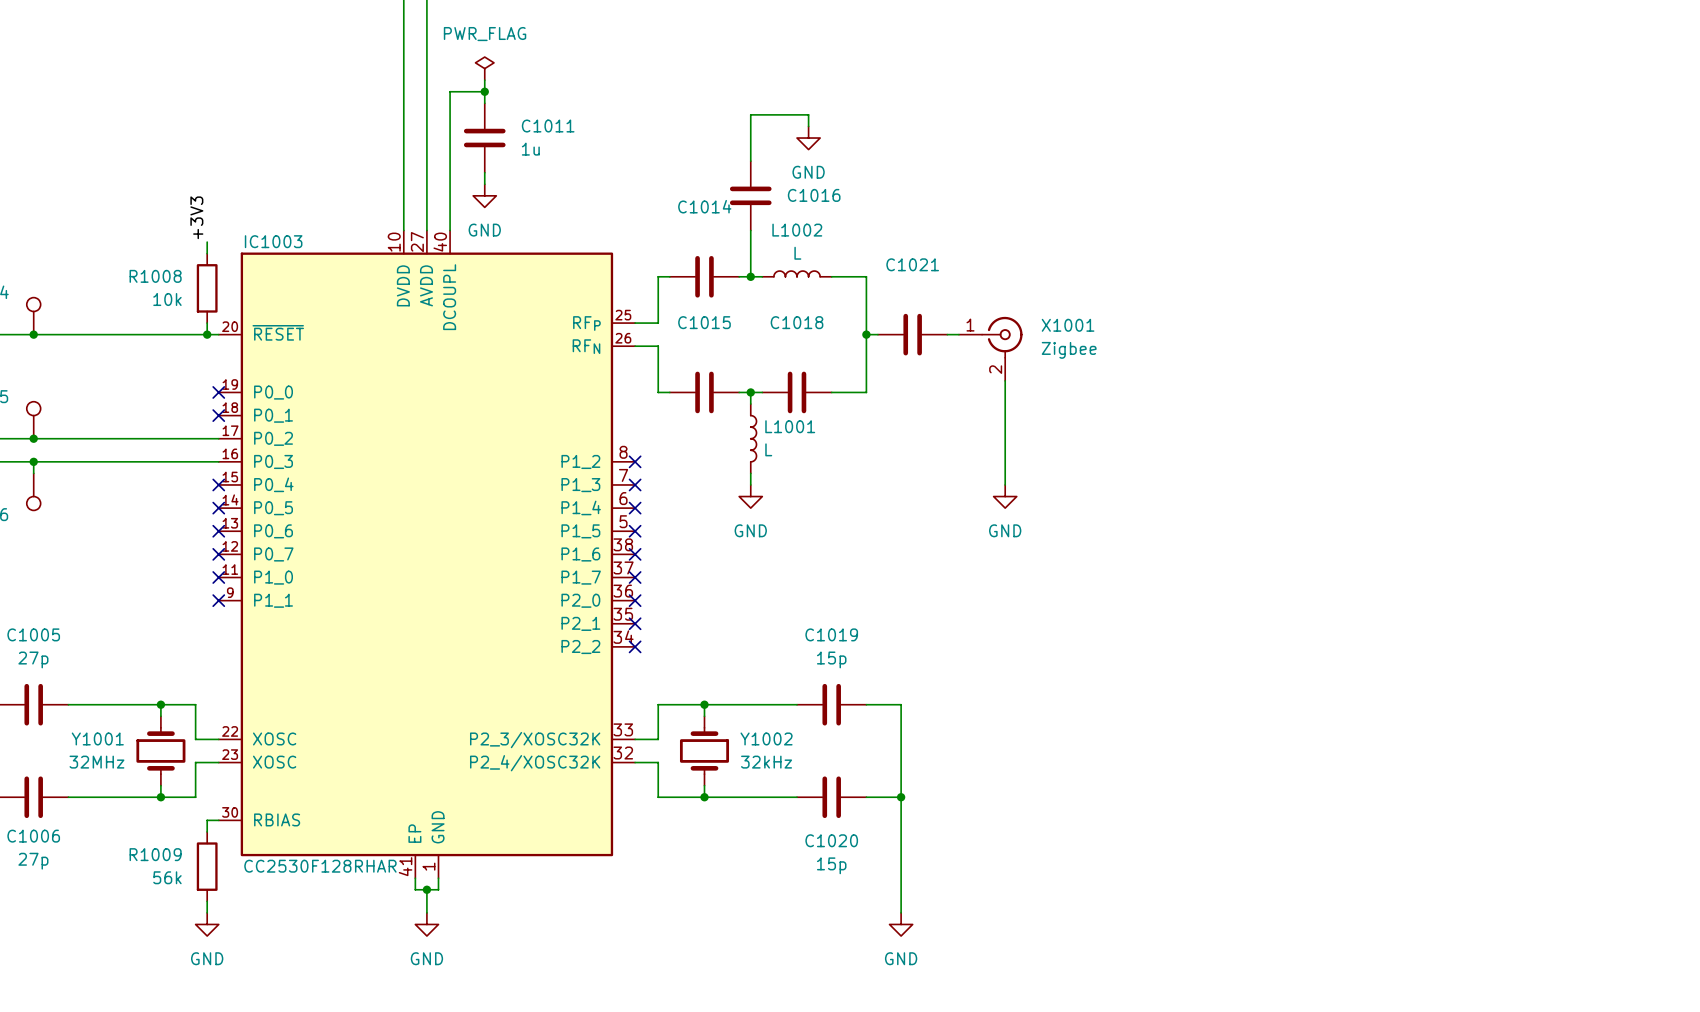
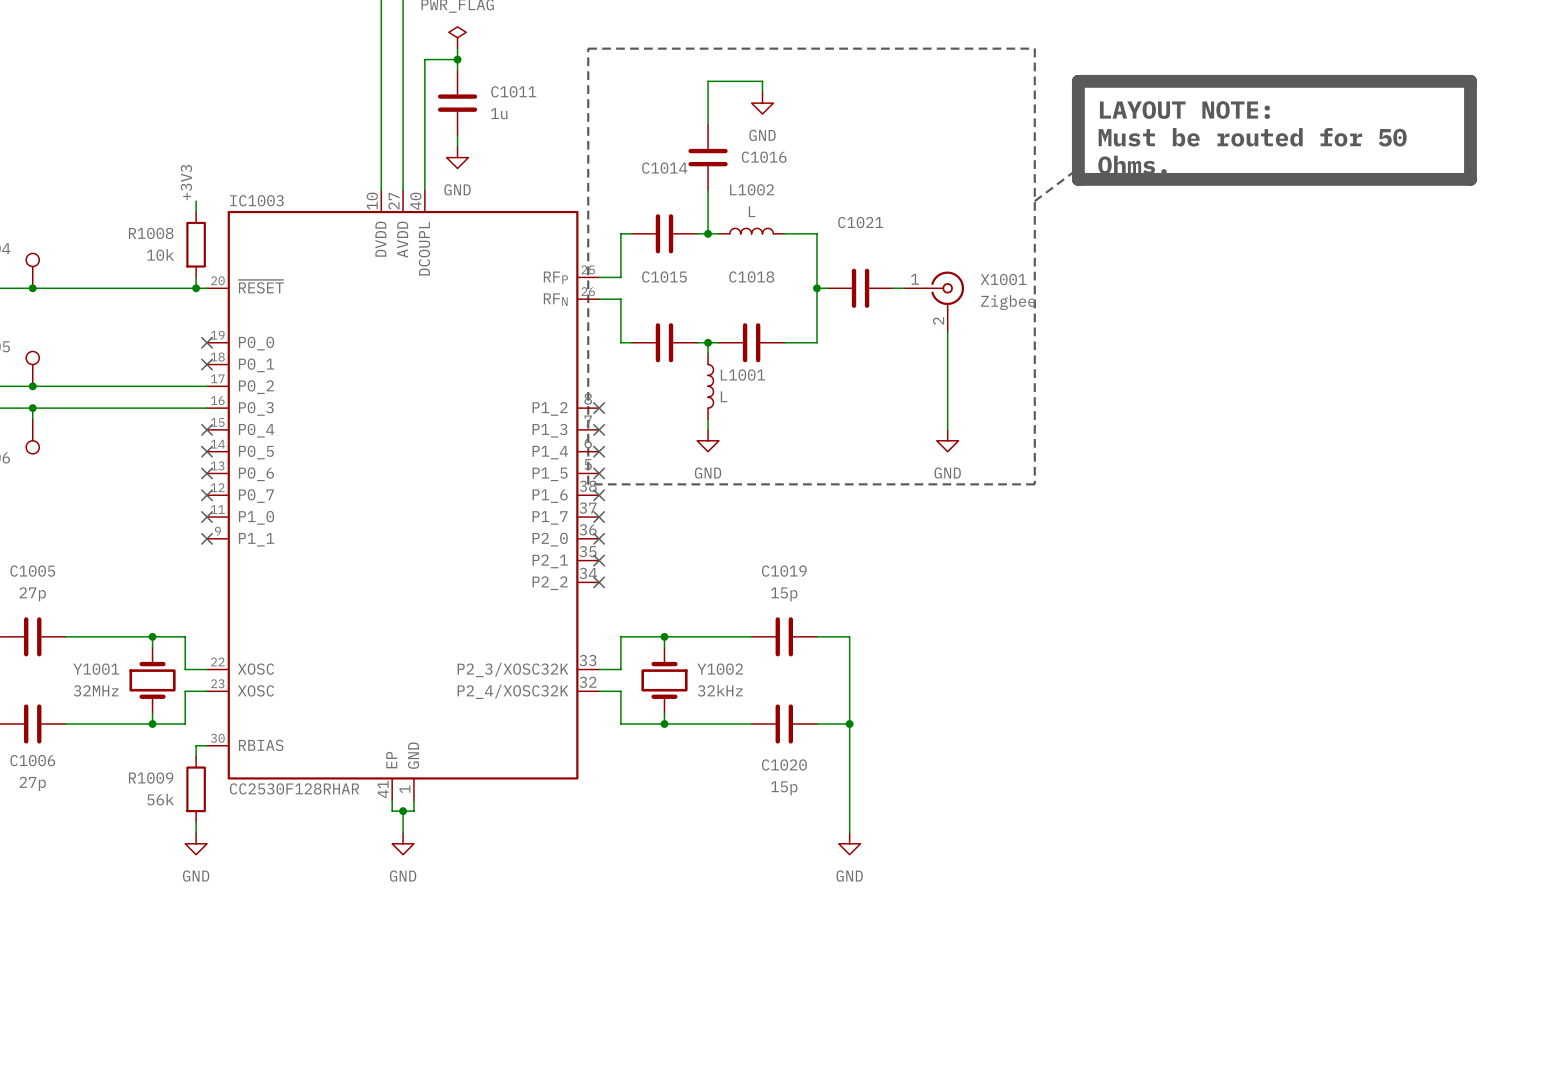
line: none -> (588, 48) (1034, 48) (1034, 484) (588, 484) (588, 48)
line: none -> (1078, 81) (1470, 81) (1470, 179) (1078, 179) (1078, 81)
text: none -> LAYOUT NOTE: (1184, 110)
text: none -> Must be routed for 50 (1252, 137)
text: none -> Ohms. (1132, 164)
line: none -> (1078, 168) (1034, 201)

